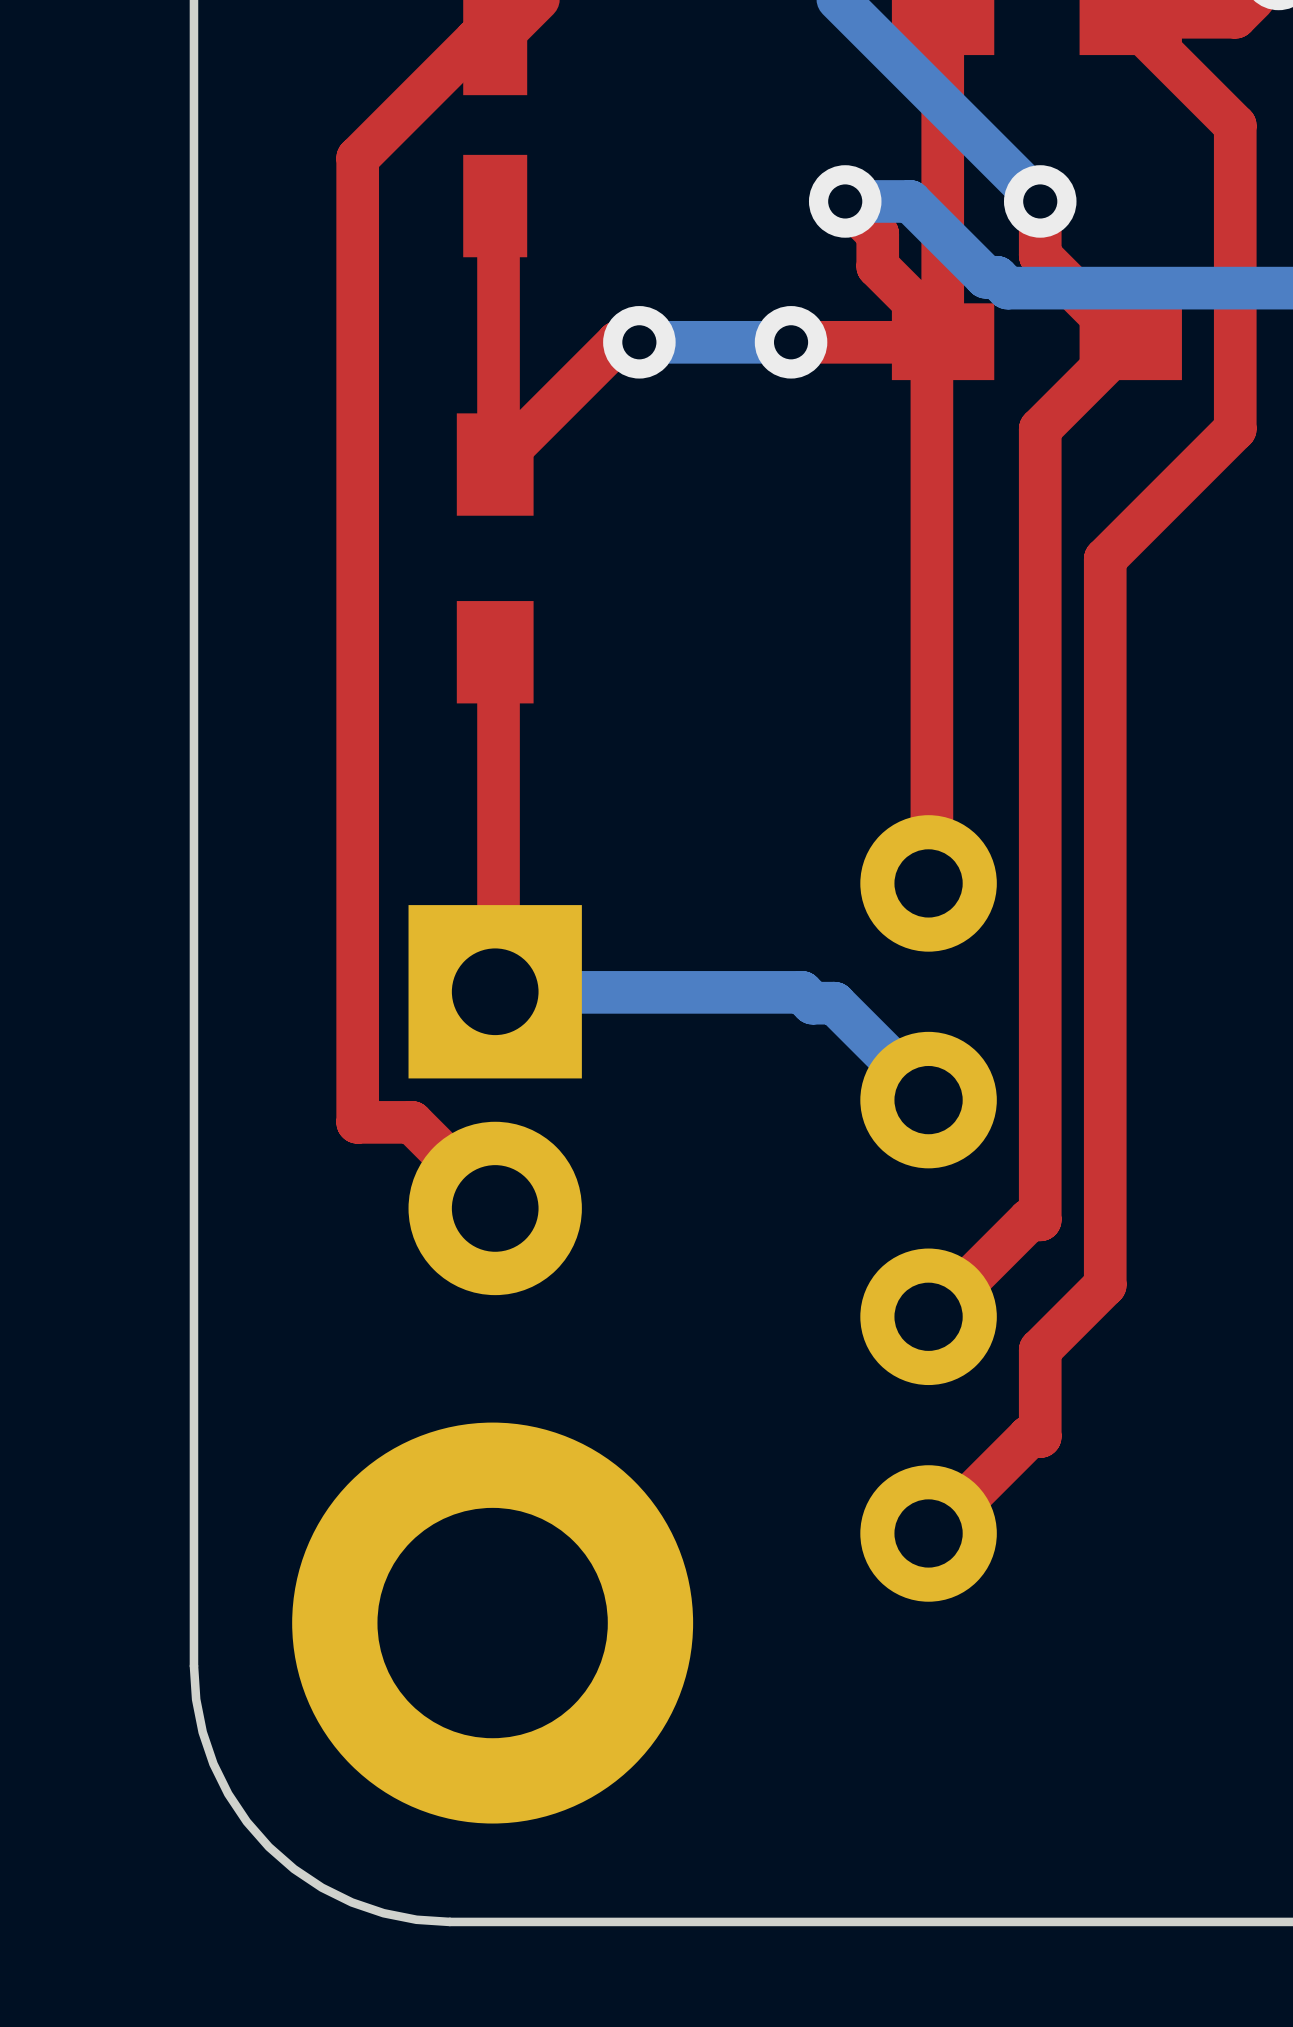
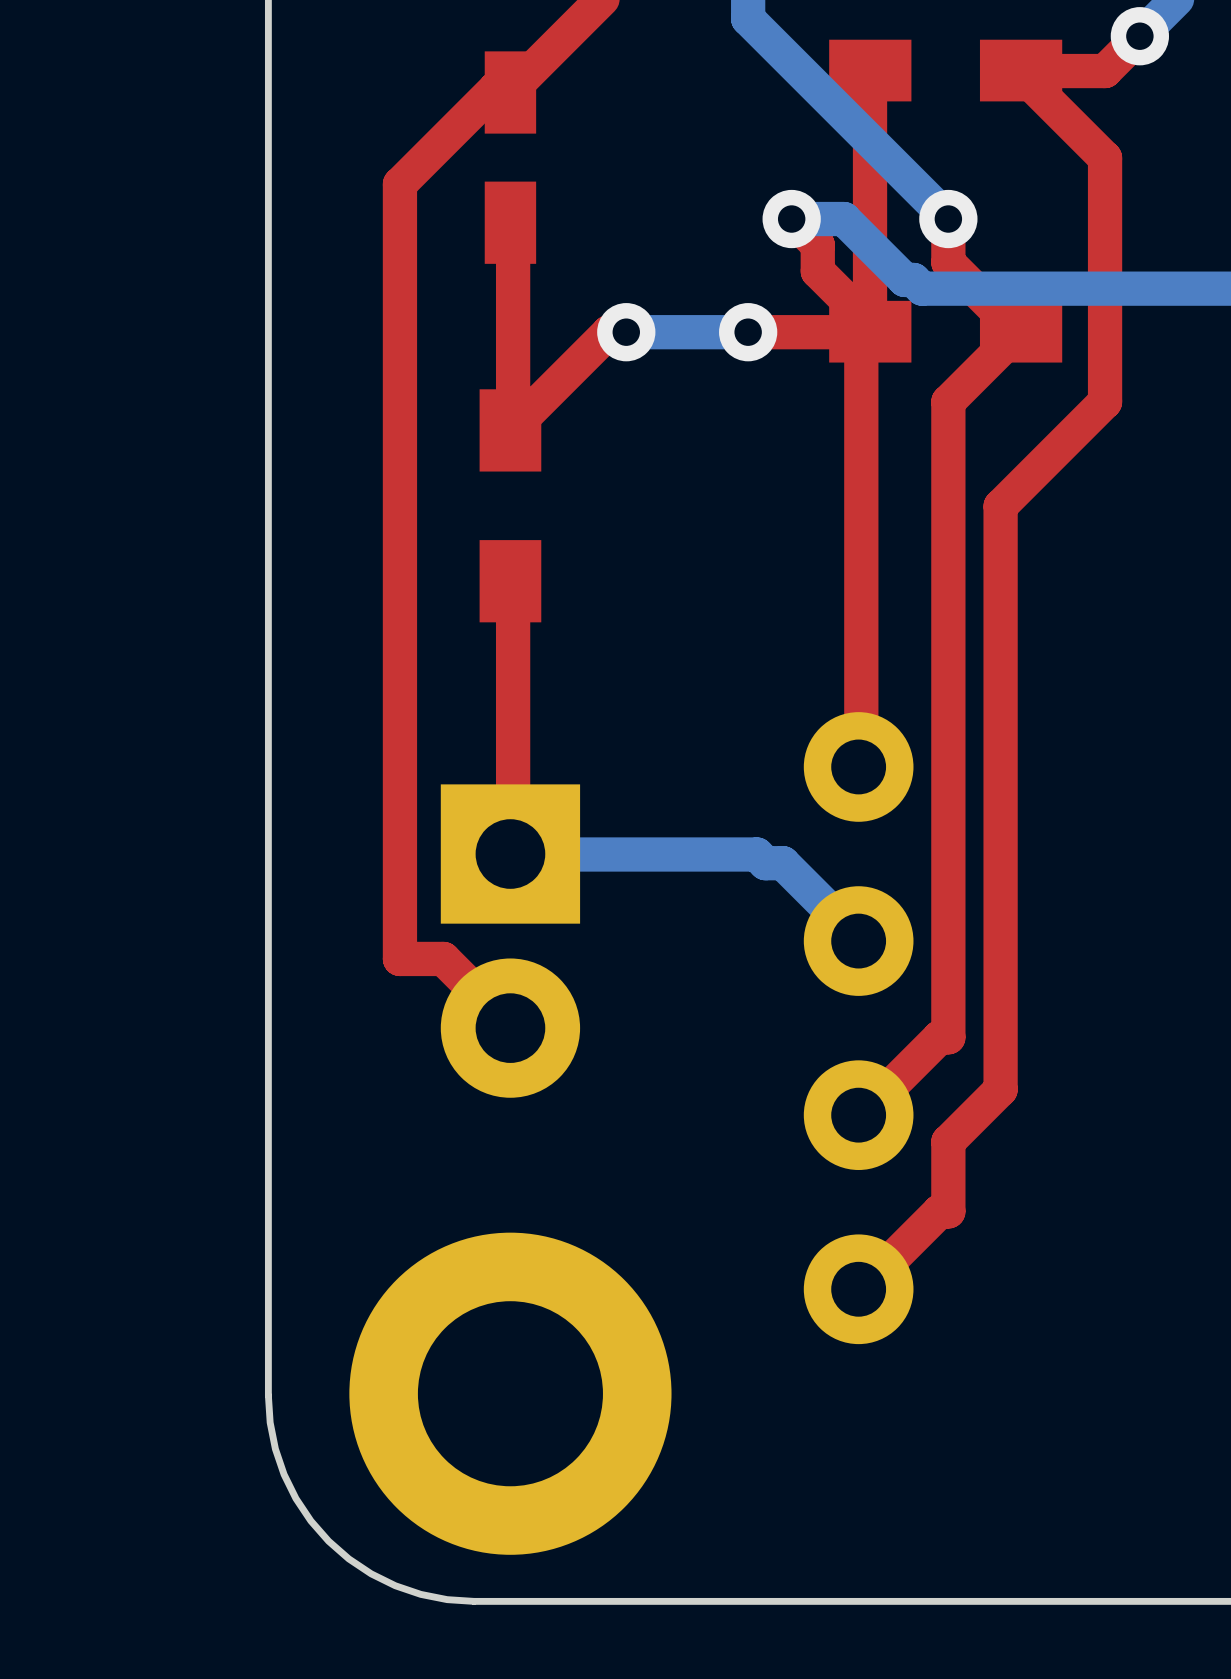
part position: (492, 1623) -> (510, 1393)

